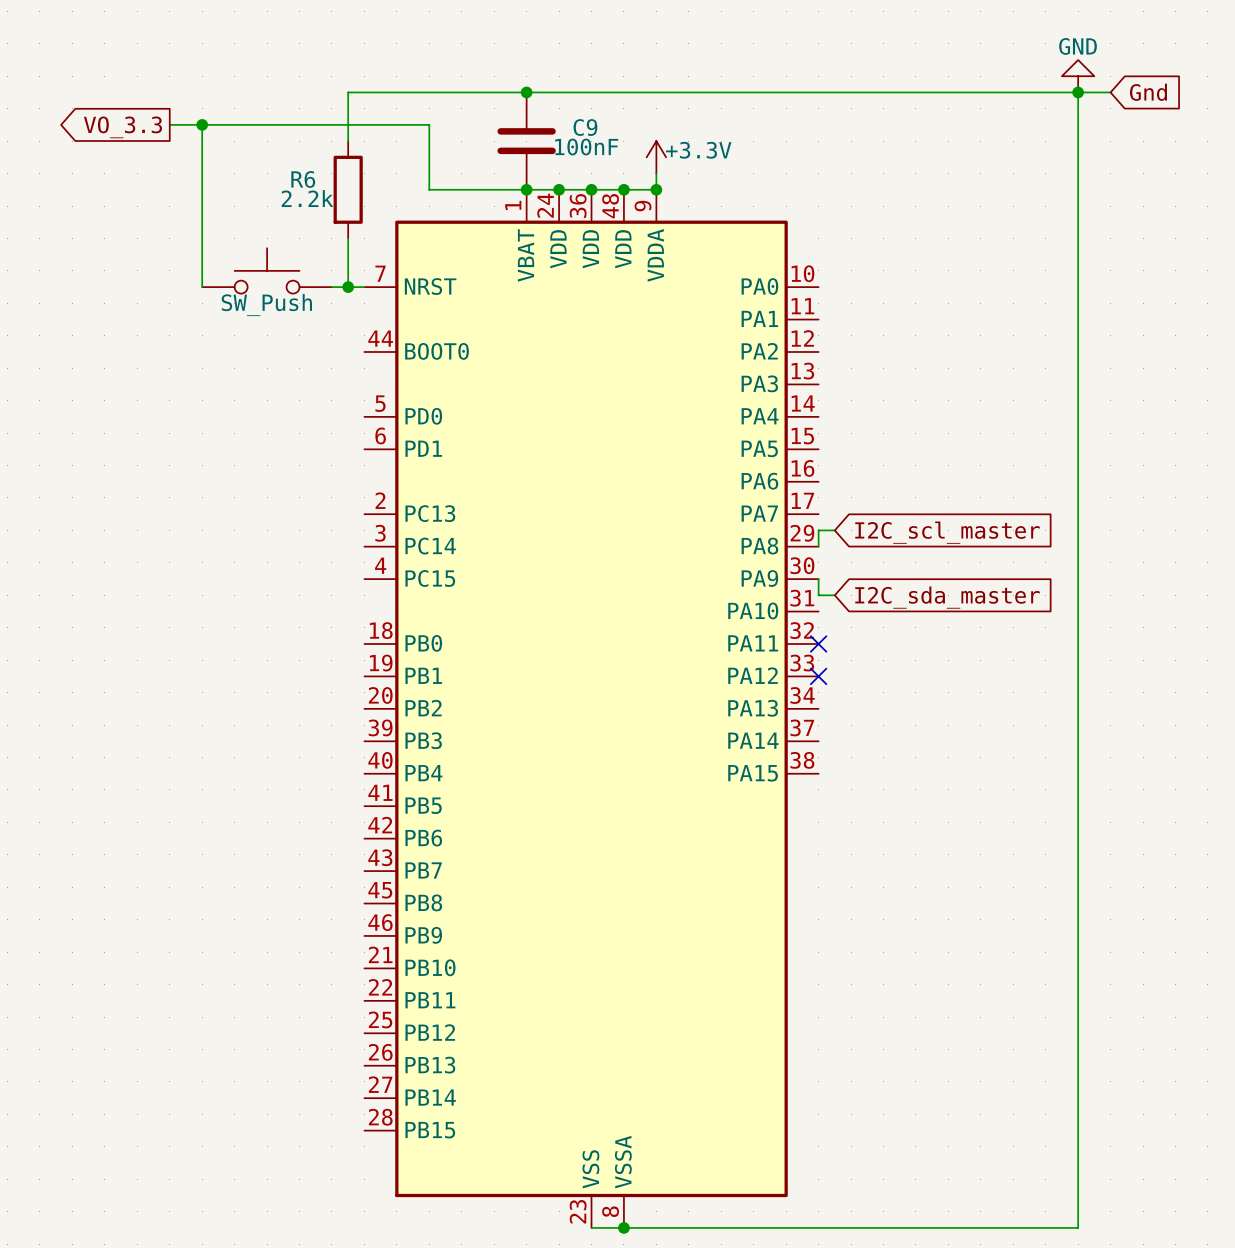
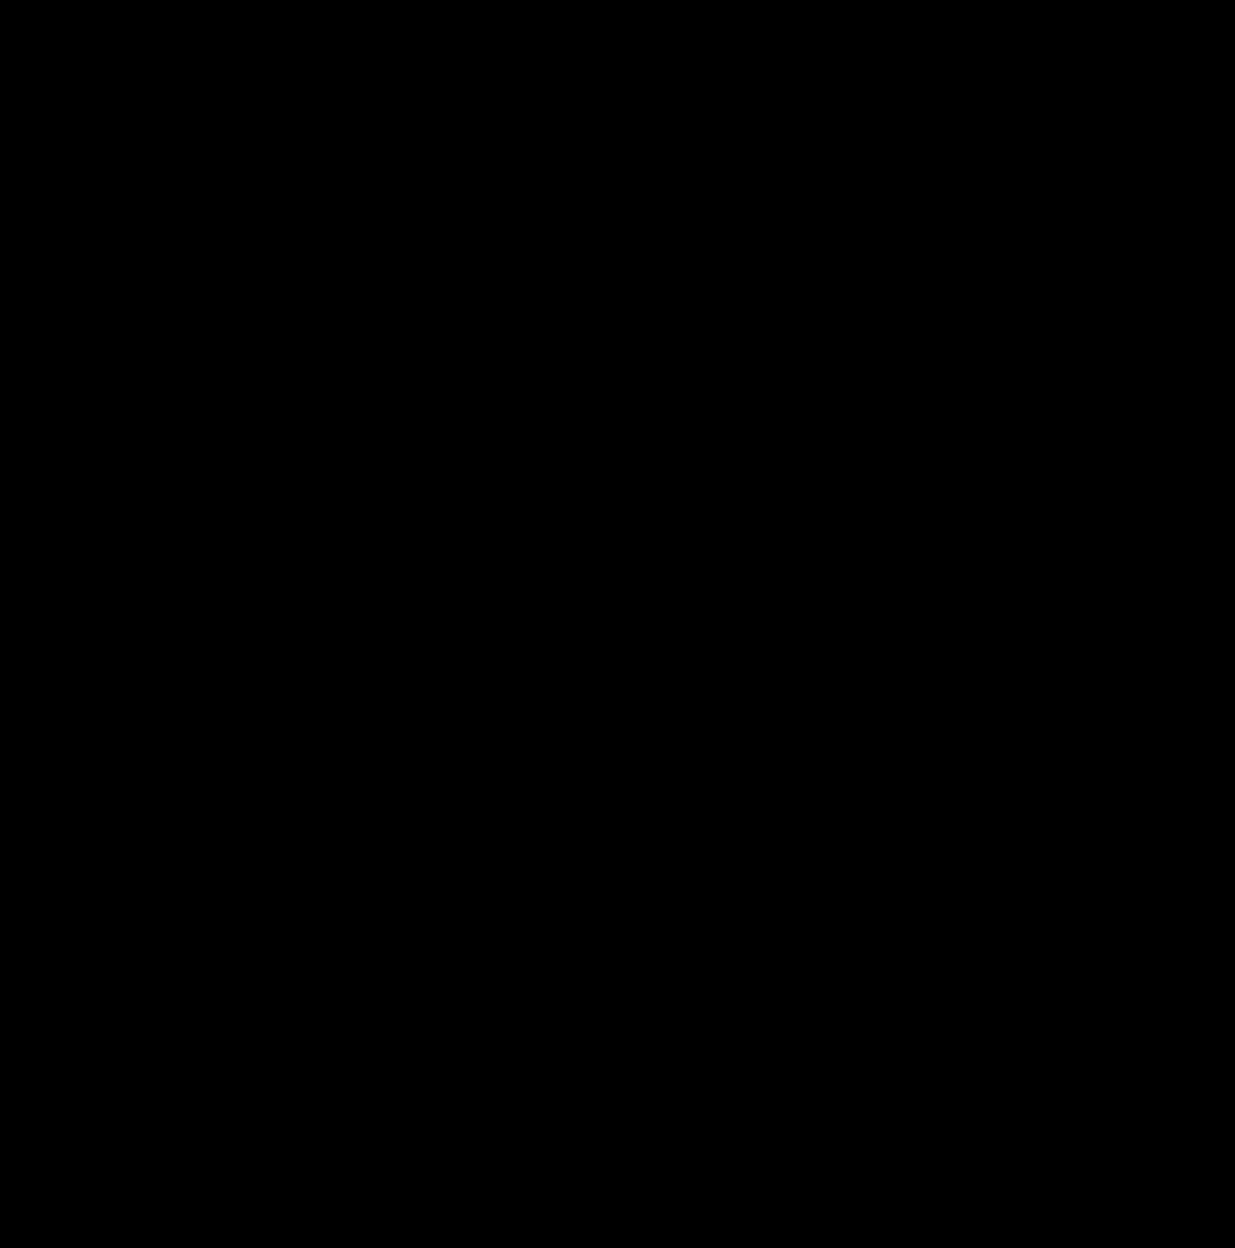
power symbol: GND (1078, 76) -> none
junction: (526, 92) -> none
wire: (1078, 92) (1078, 1227) (591, 1227) -> none
junction: (1078, 92) -> none
wire: (1110, 92) (348, 92) (348, 141) -> none
global label: Gnd (1148, 92) -> none
wire: (169, 124) (429, 124) (429, 189) (656, 189) (656, 173) -> none
wire: (202, 124) (202, 287) -> none
junction: (202, 124) -> none
global label: VO_3.3 (122, 127) -> none
C9: 100nF (526, 141) -> none
power symbol: +3.3V (656, 157) -> none
R6: 2.2k (348, 189) -> none
junction: (526, 189) -> none
junction: (559, 189) -> none
junction: (591, 189) -> none
junction: (623, 189) -> none
junction: (656, 189) -> none
wire: (348, 238) (348, 287) -> none
part: SW_Push (267, 270) -> none
wire: (331, 287) (364, 287) -> none
junction: (348, 287) -> none
wire: (834, 530) (818, 530) (818, 546) -> none
global label: I2C_scl_master (947, 532) -> none
wire: (818, 579) (818, 595) (834, 595) -> none
global label: I2C_sda_master (947, 597) -> none
no-connect mark: (818, 643) -> none
no-connect mark: (818, 676) -> none
part: (591, 708) -> none
junction: (623, 1227) -> none

